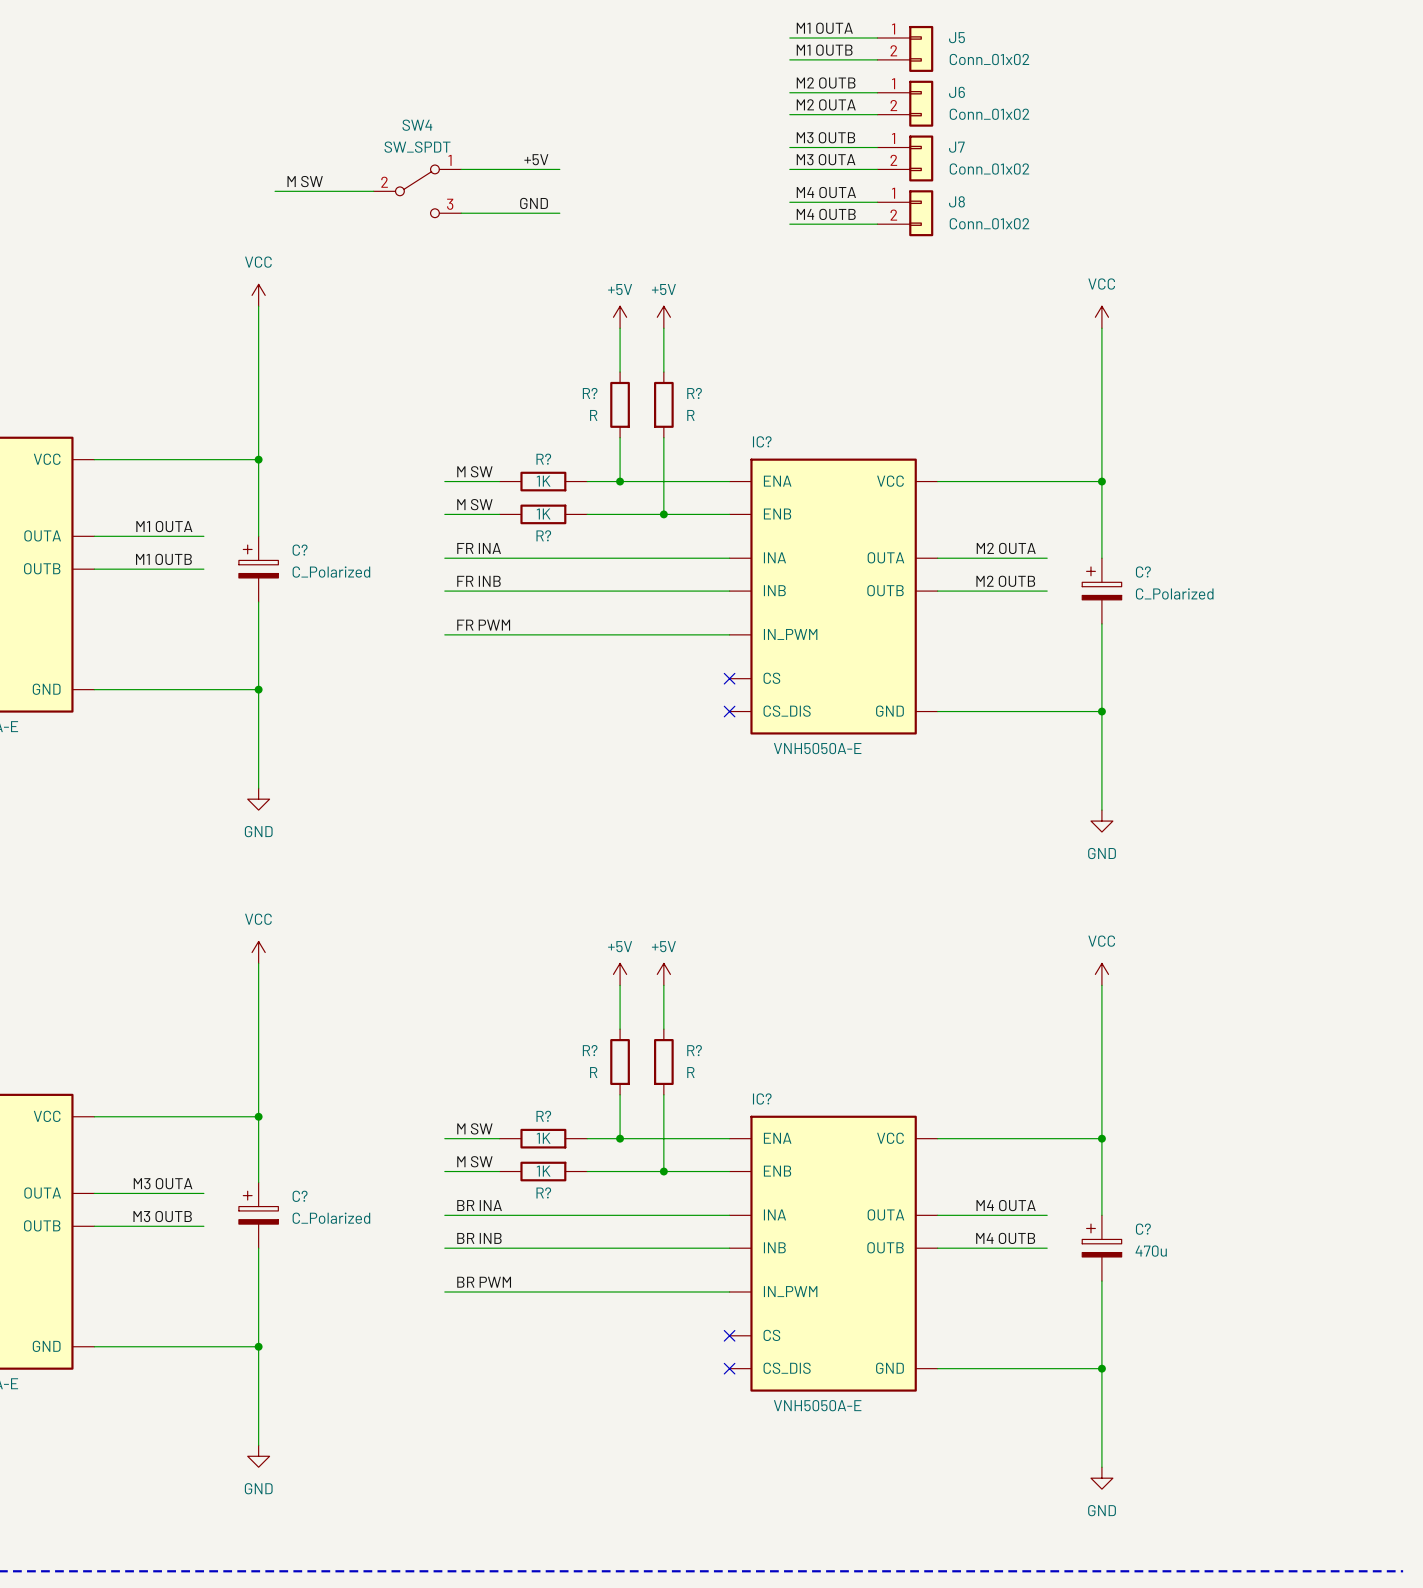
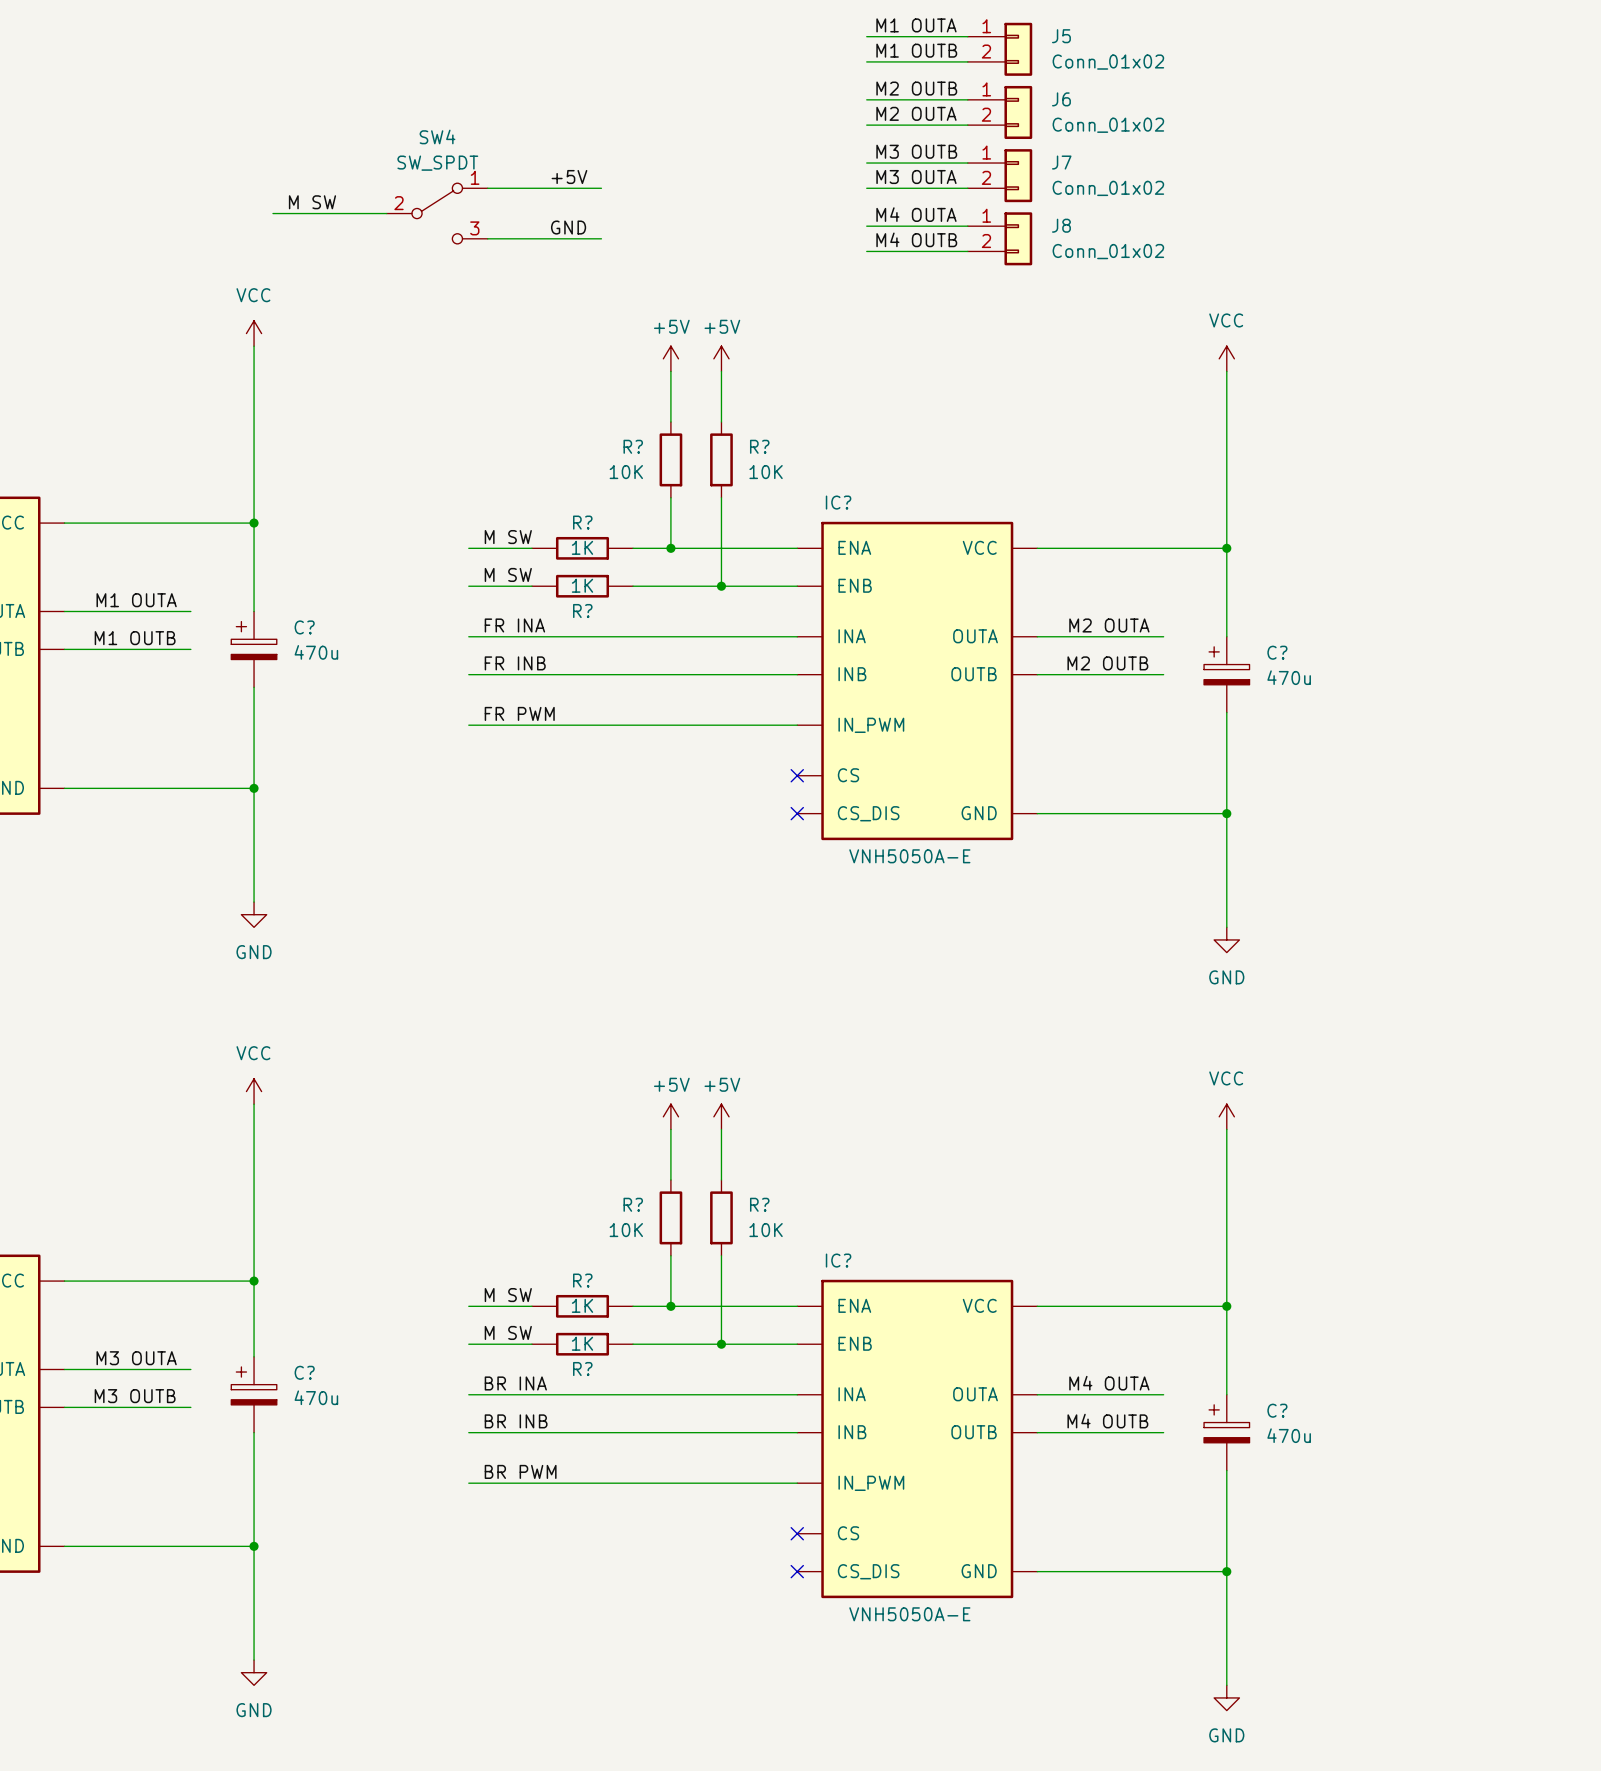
R? value: R (593, 415) -> 10K (626, 472)
R? value: R (690, 415) -> 10K (766, 472)
C? value: C_Polarized (331, 572) -> 470u (316, 652)
C? value: C_Polarized (1174, 593) -> 470u (1289, 677)
R? value: R (593, 1072) -> 10K (626, 1230)
R? value: R (690, 1072) -> 10K (766, 1230)
C? value: C_Polarized (331, 1218) -> 470u (316, 1397)

